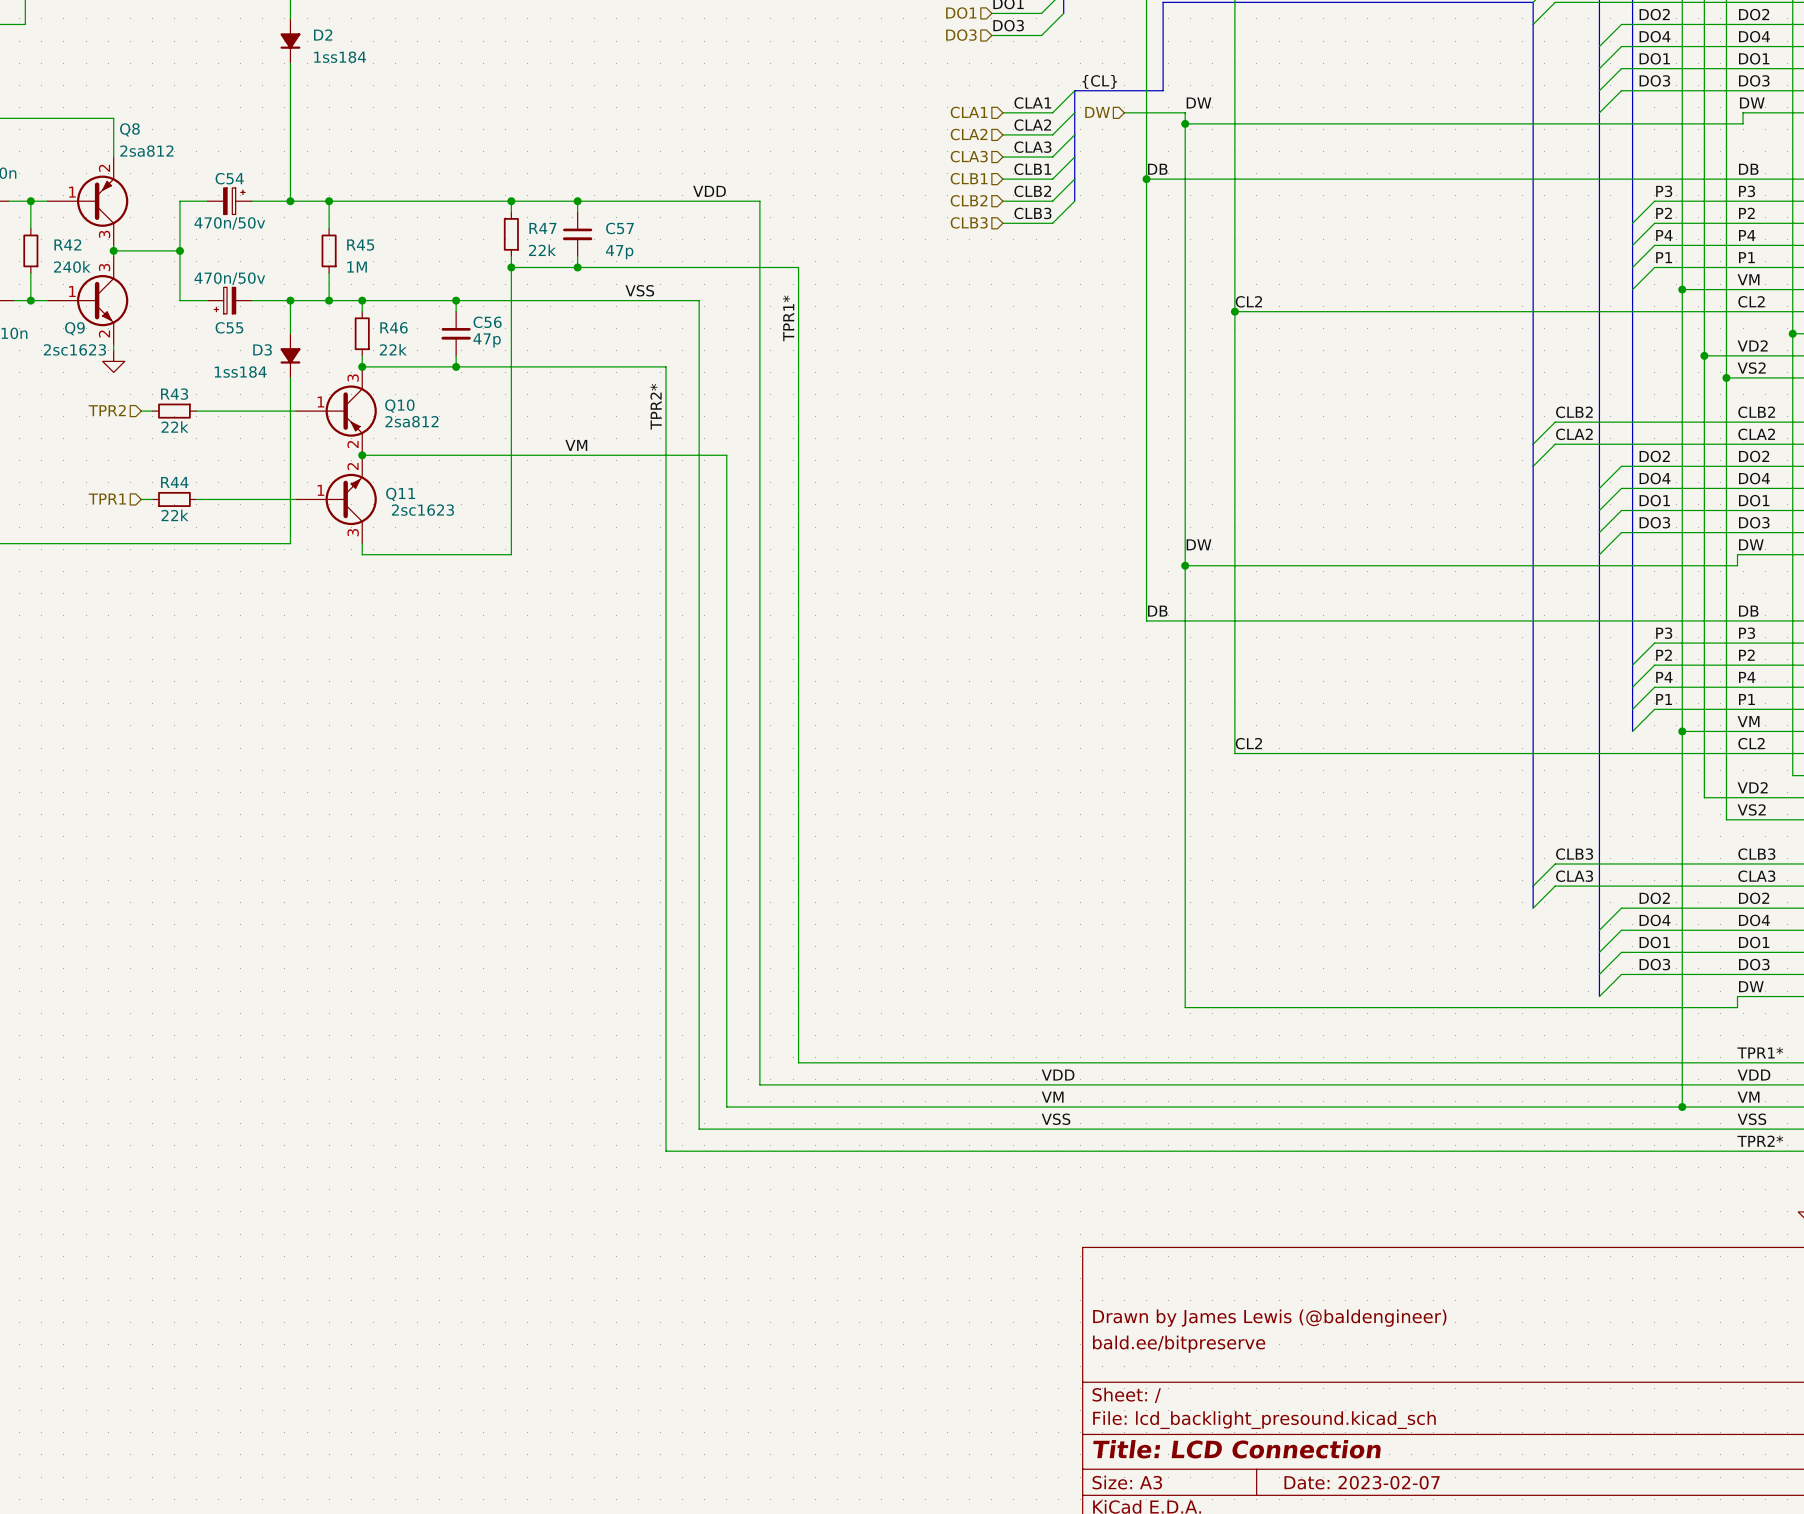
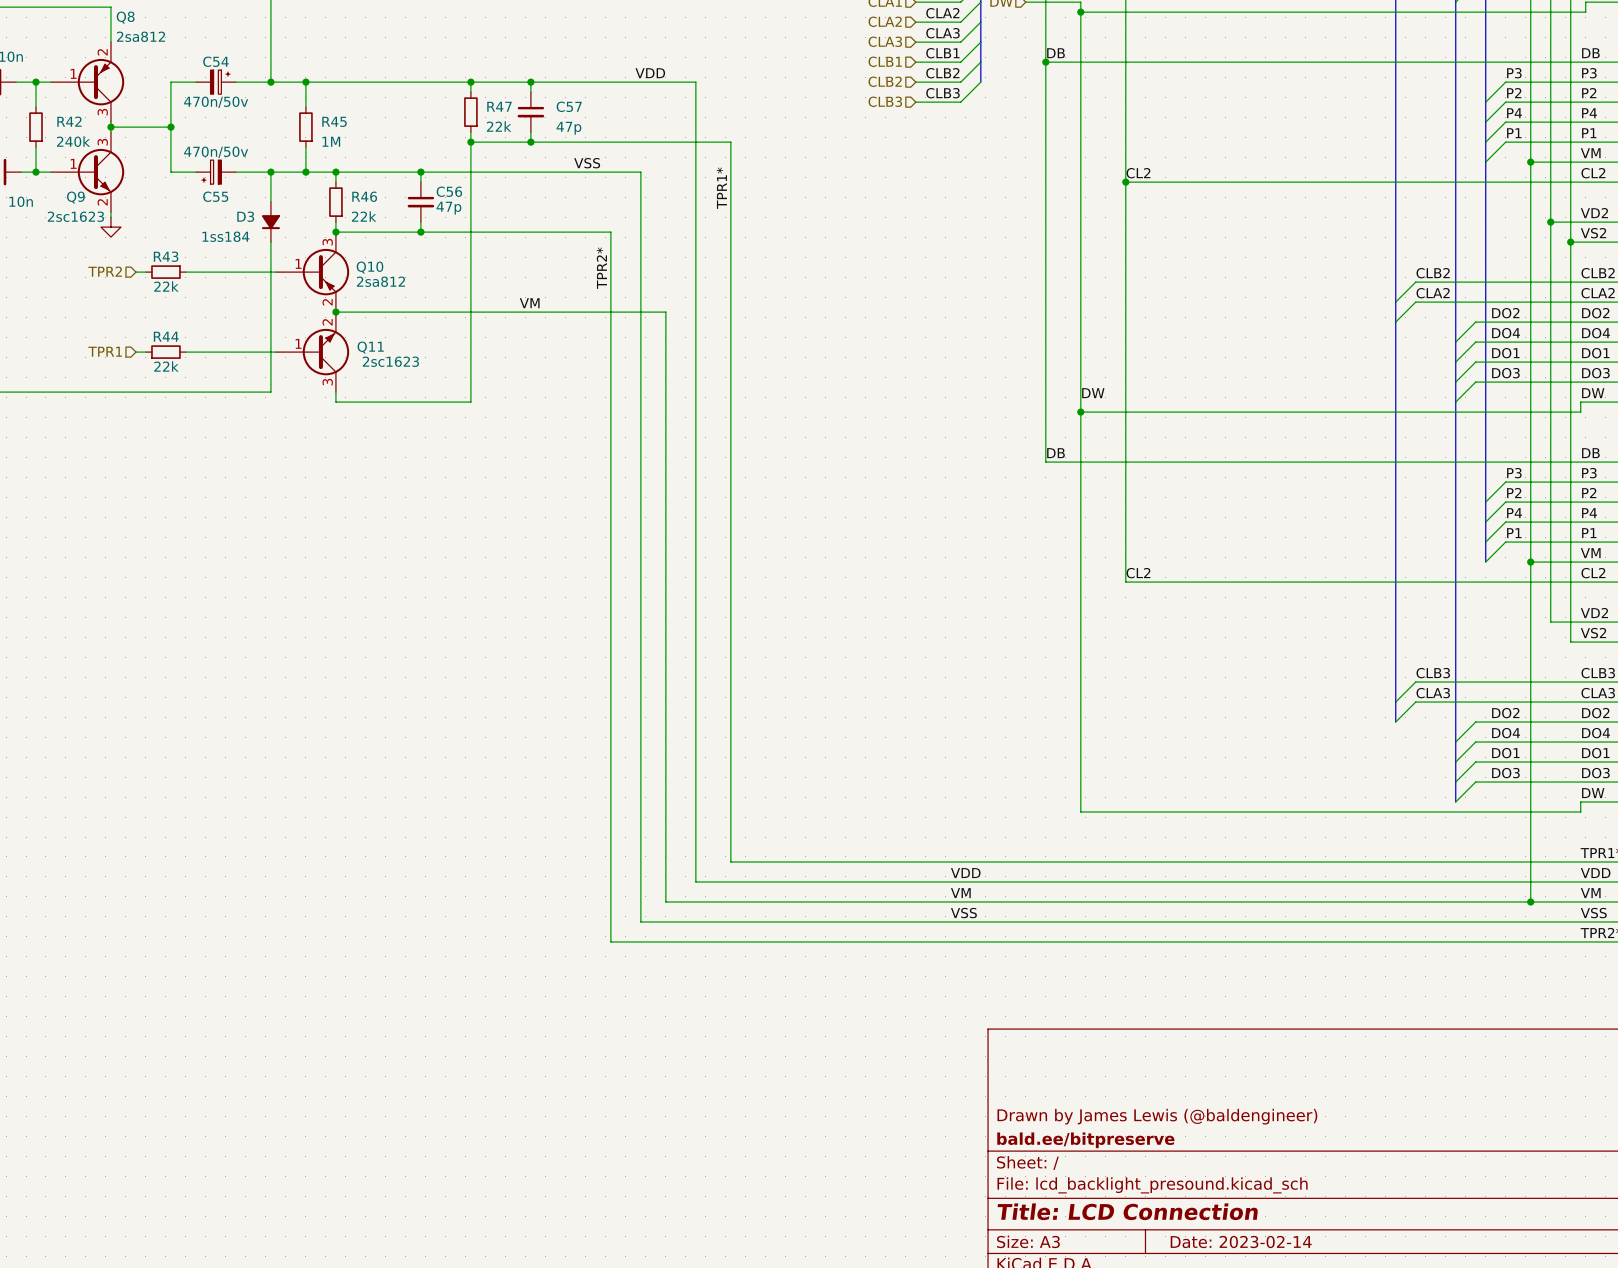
title block: Drawn by James Lewis (@baldengineer) (1269, 1318) -> none
title block: bald.ee/bitpreserve (1179, 1344) -> Drawn by James Lewis (@baldengineer) (1157, 1116)
title block: none -> bald.ee/bitpreserve (1085, 1140)
title block: Date: 2023-02-07 (1362, 1482) -> Date: 2023-02-14 (1241, 1242)

